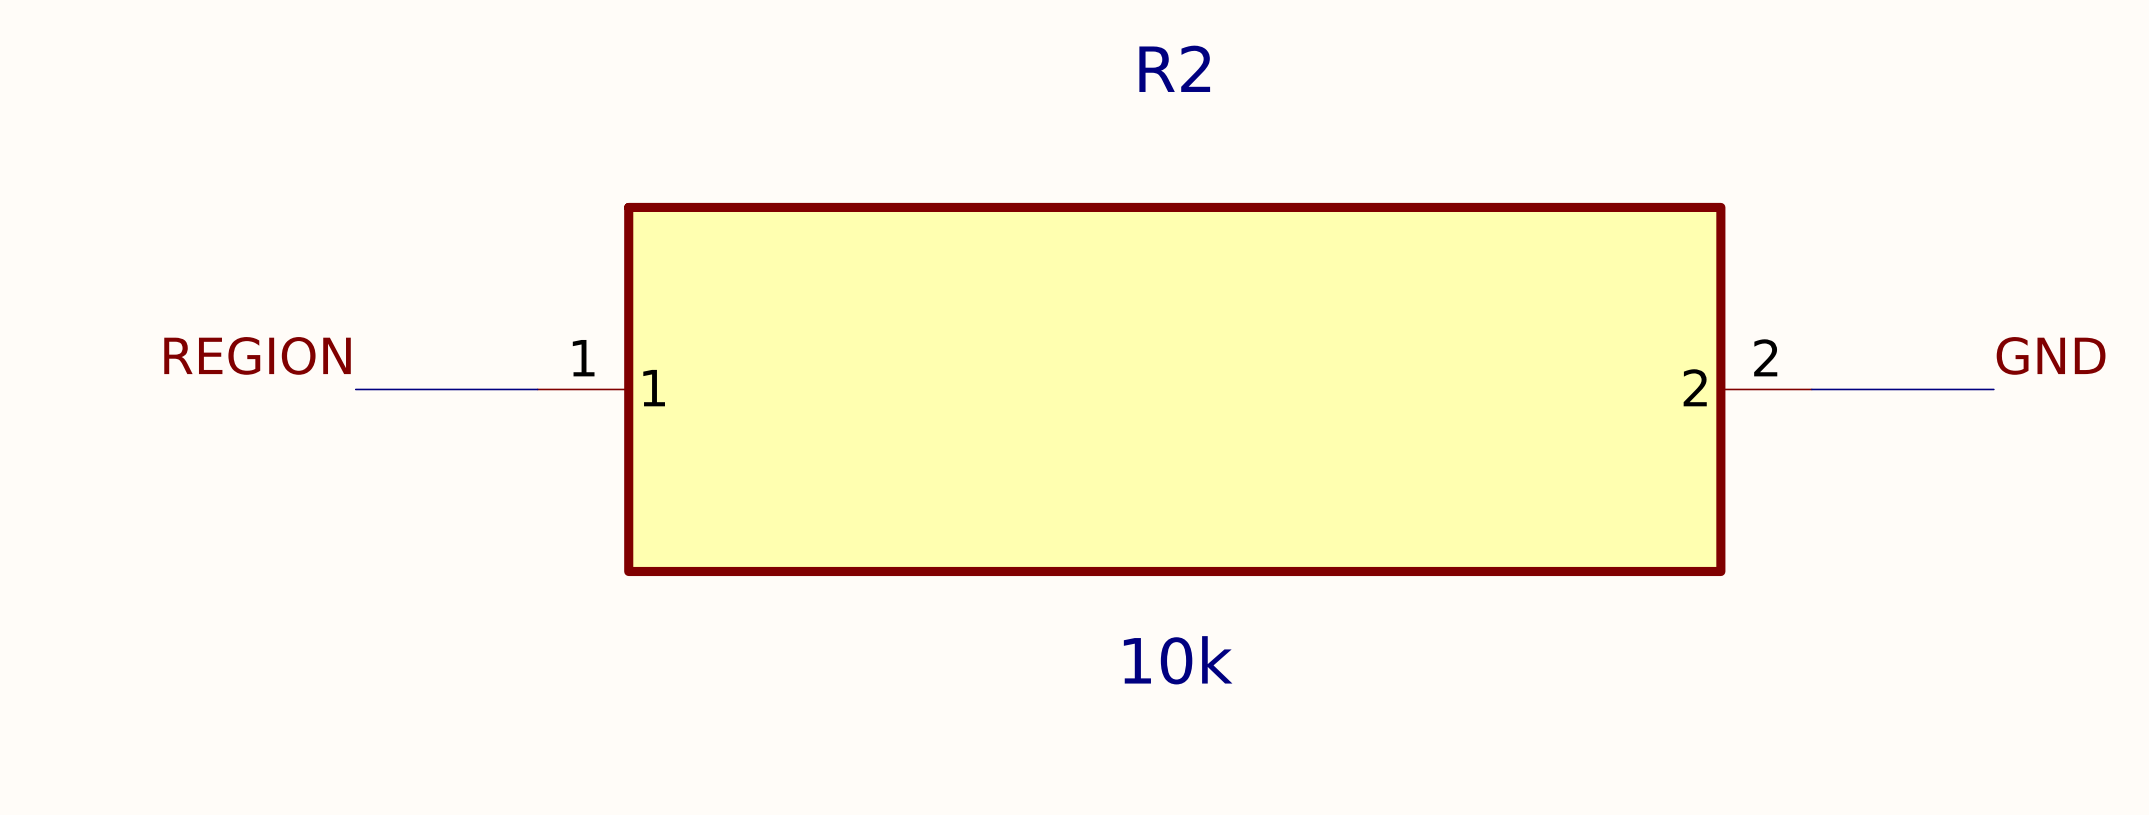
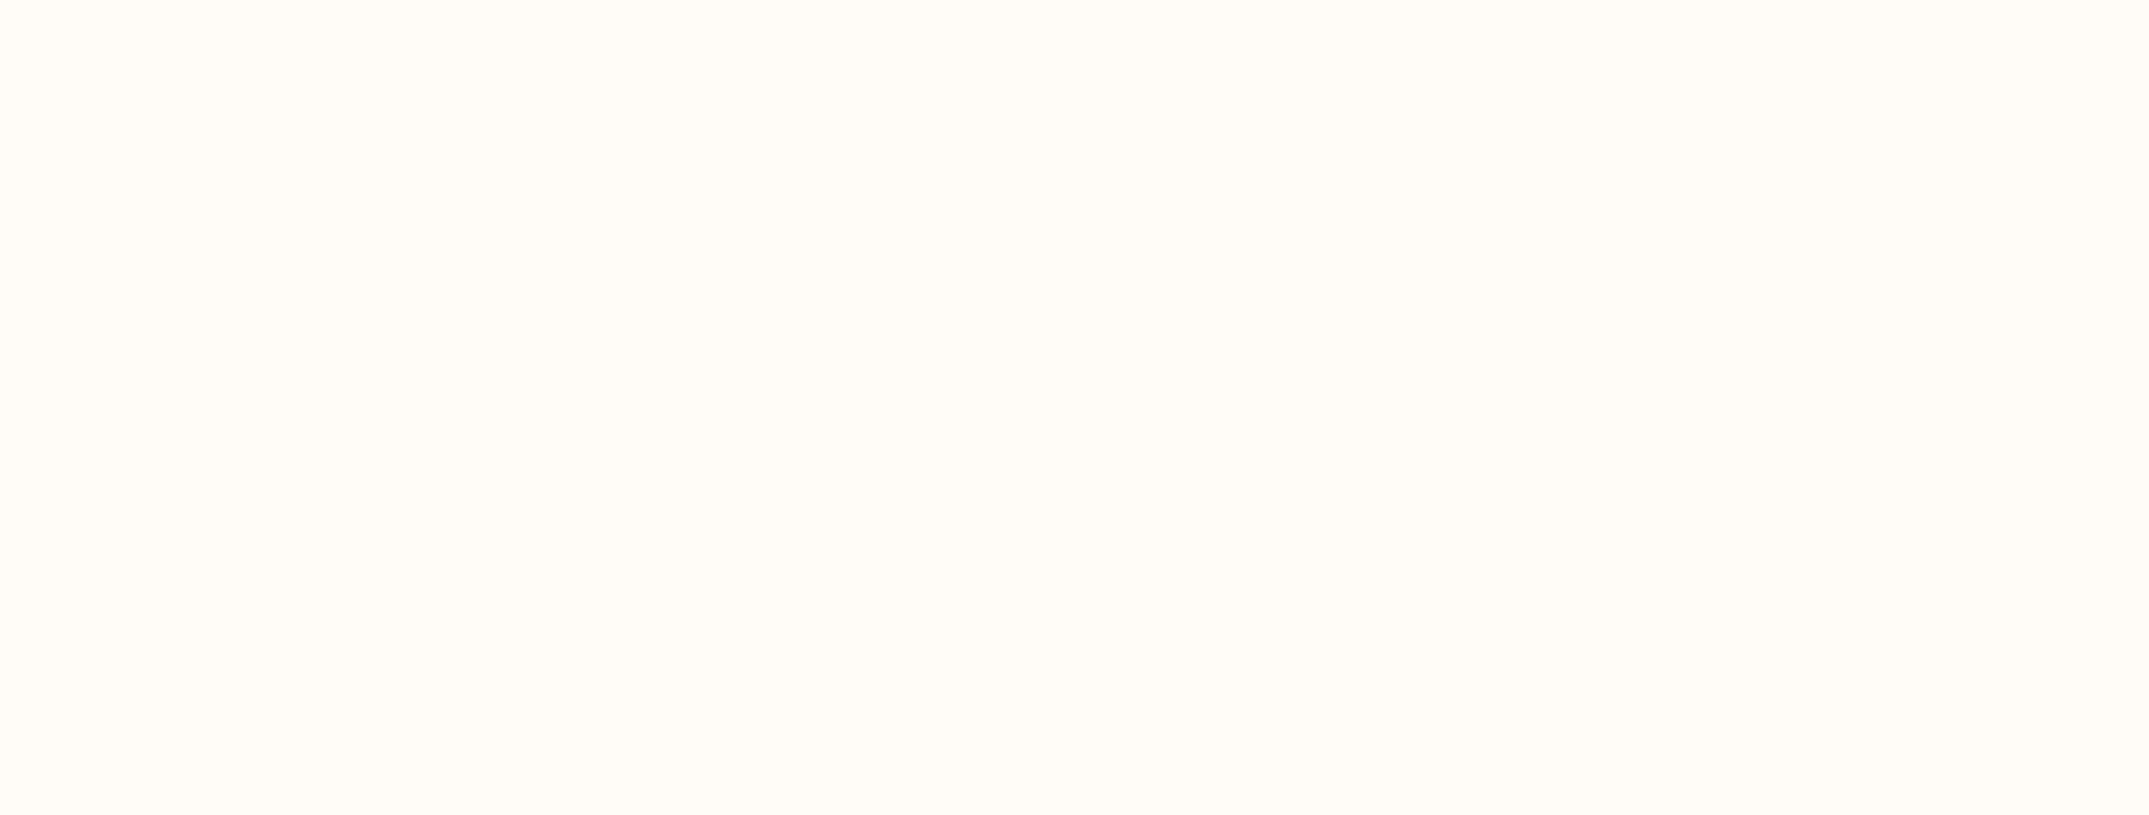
label: REGION (257, 355) -> none
label: GND (2051, 355) -> none
wire: (355, 389) (537, 389) -> none
R2: 10k (1174, 389) -> none
wire: (1811, 389) (1993, 389) -> none

